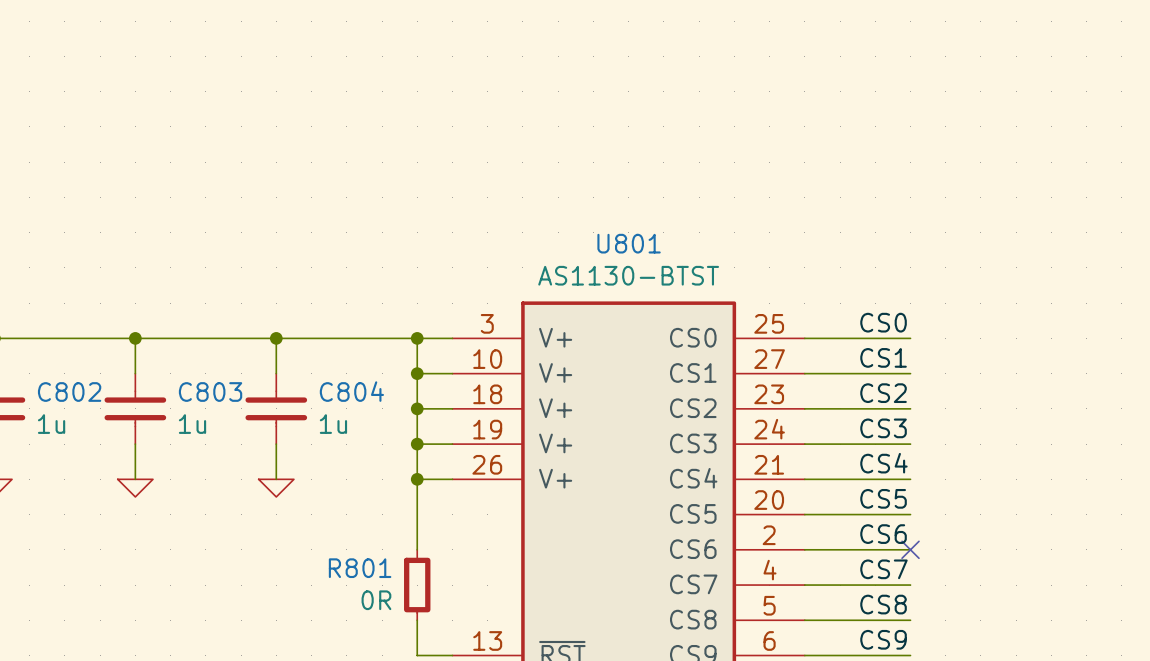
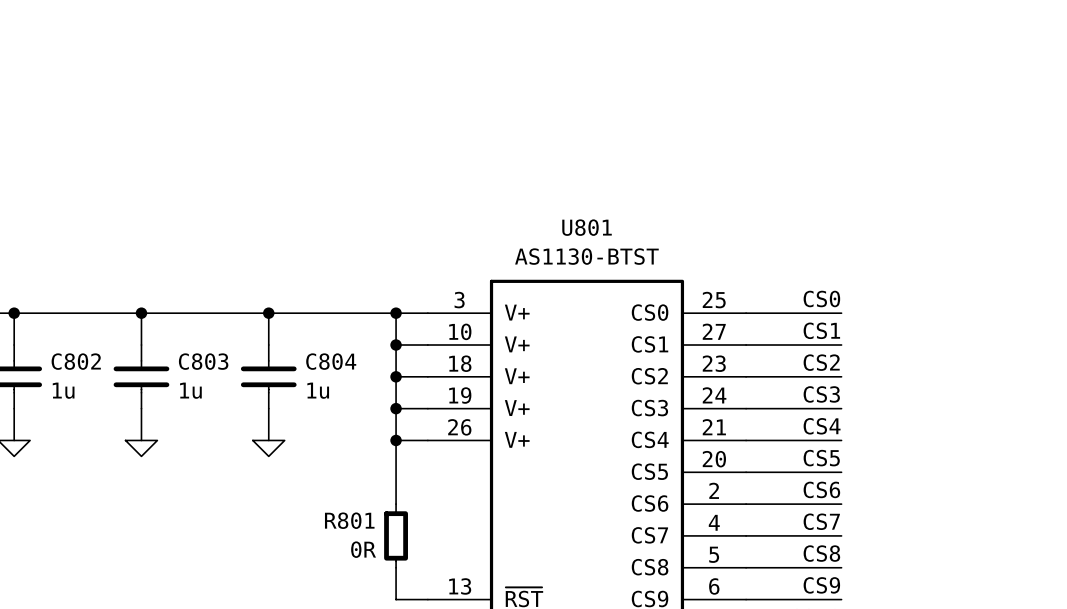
no-connect mark: (910, 549) -> none

